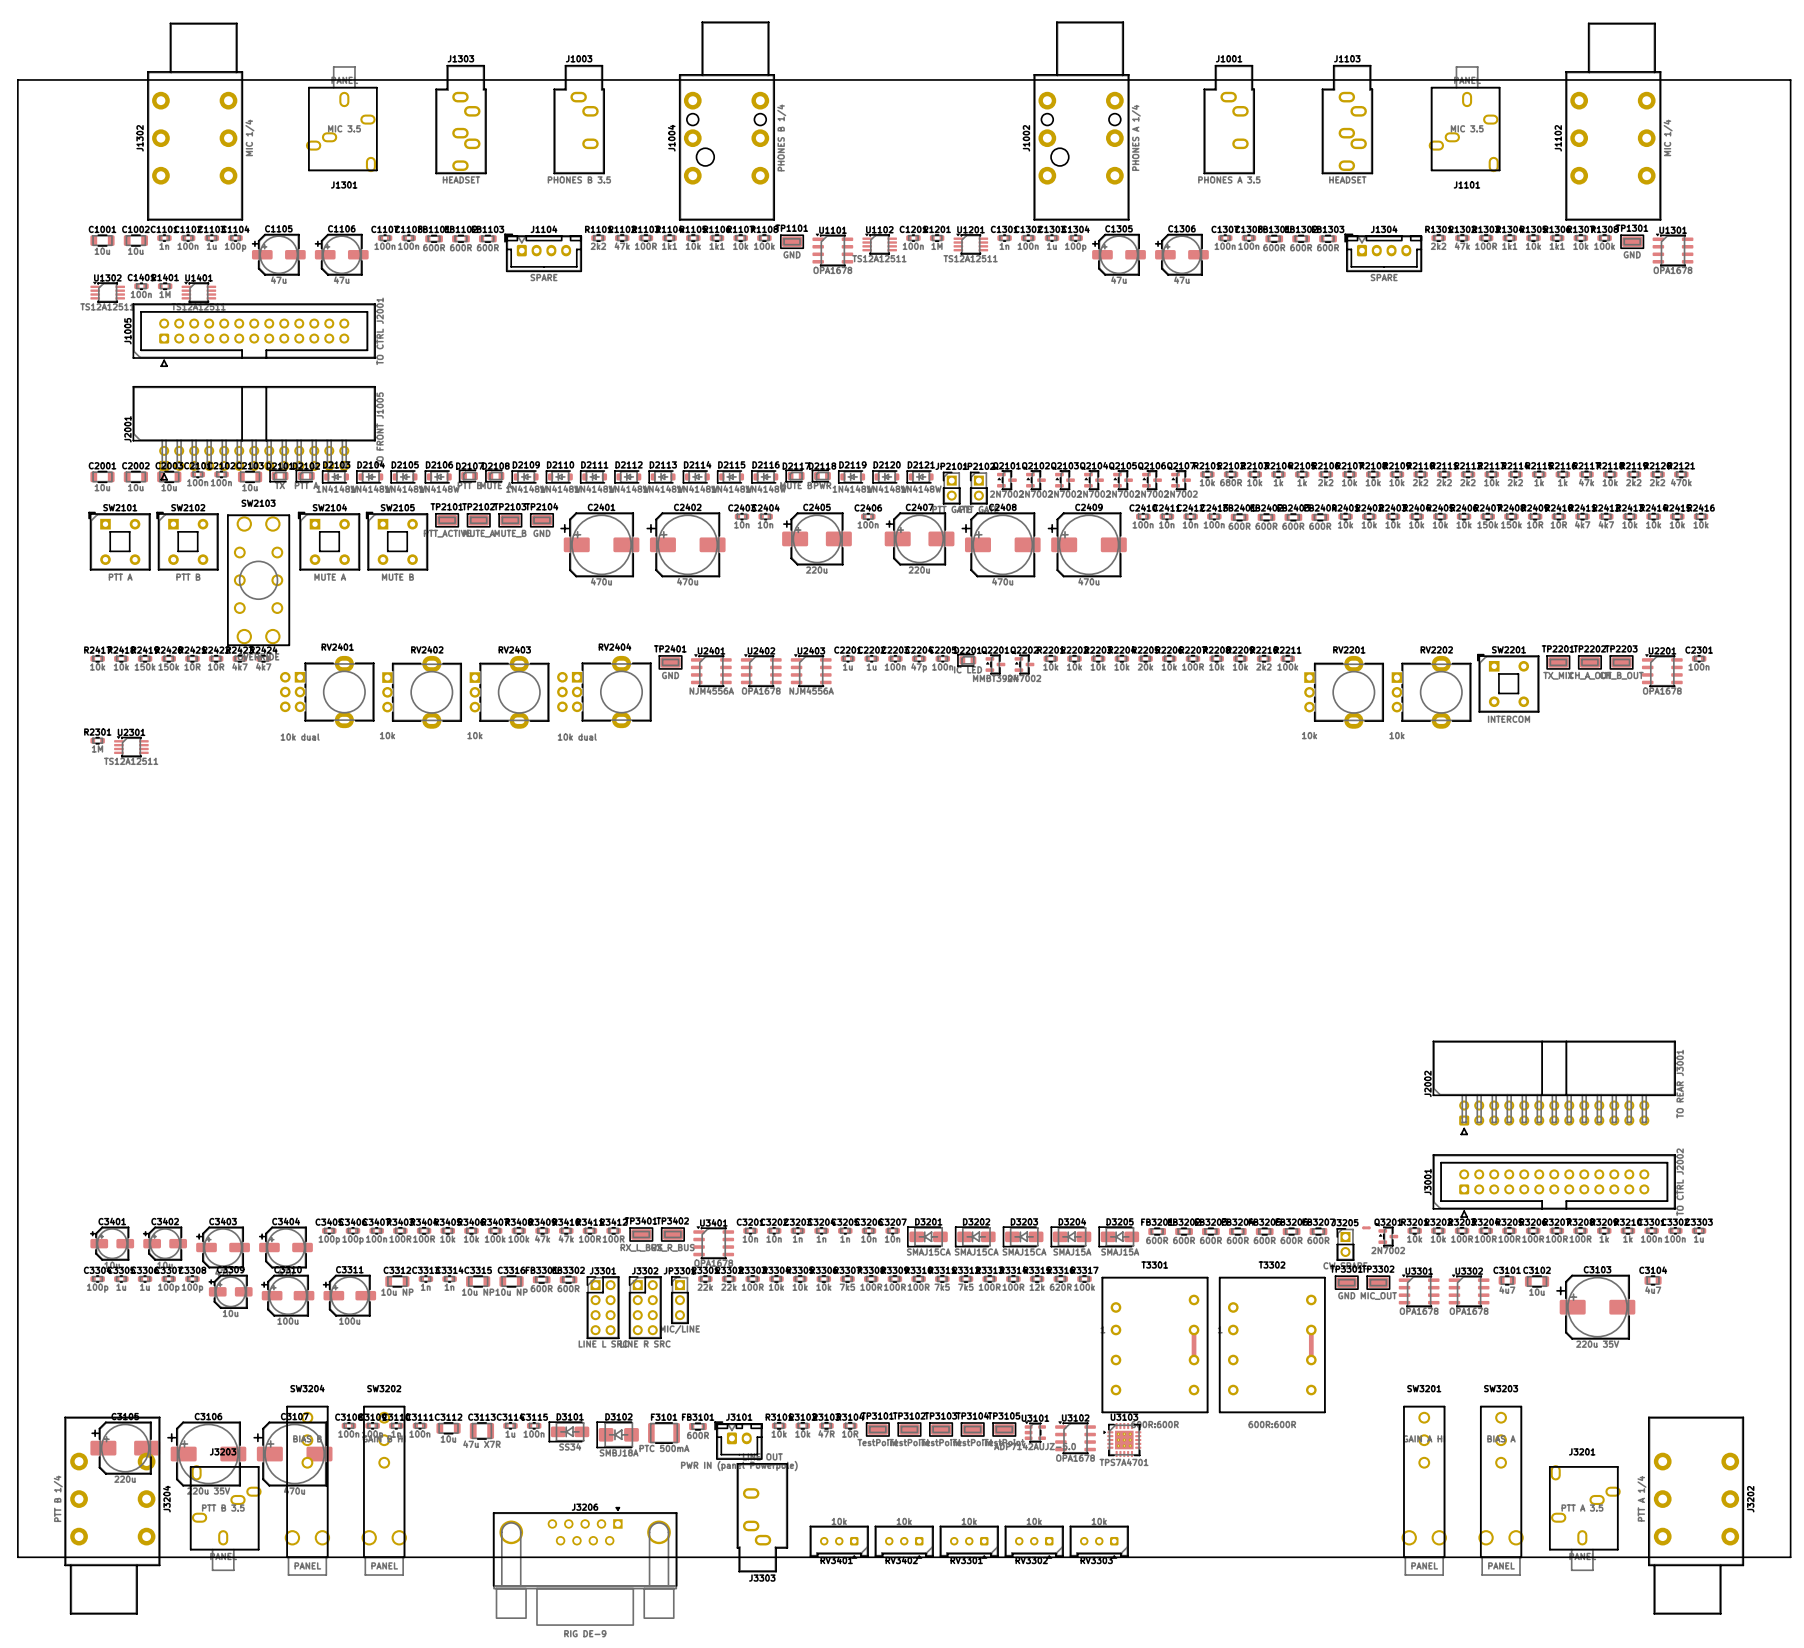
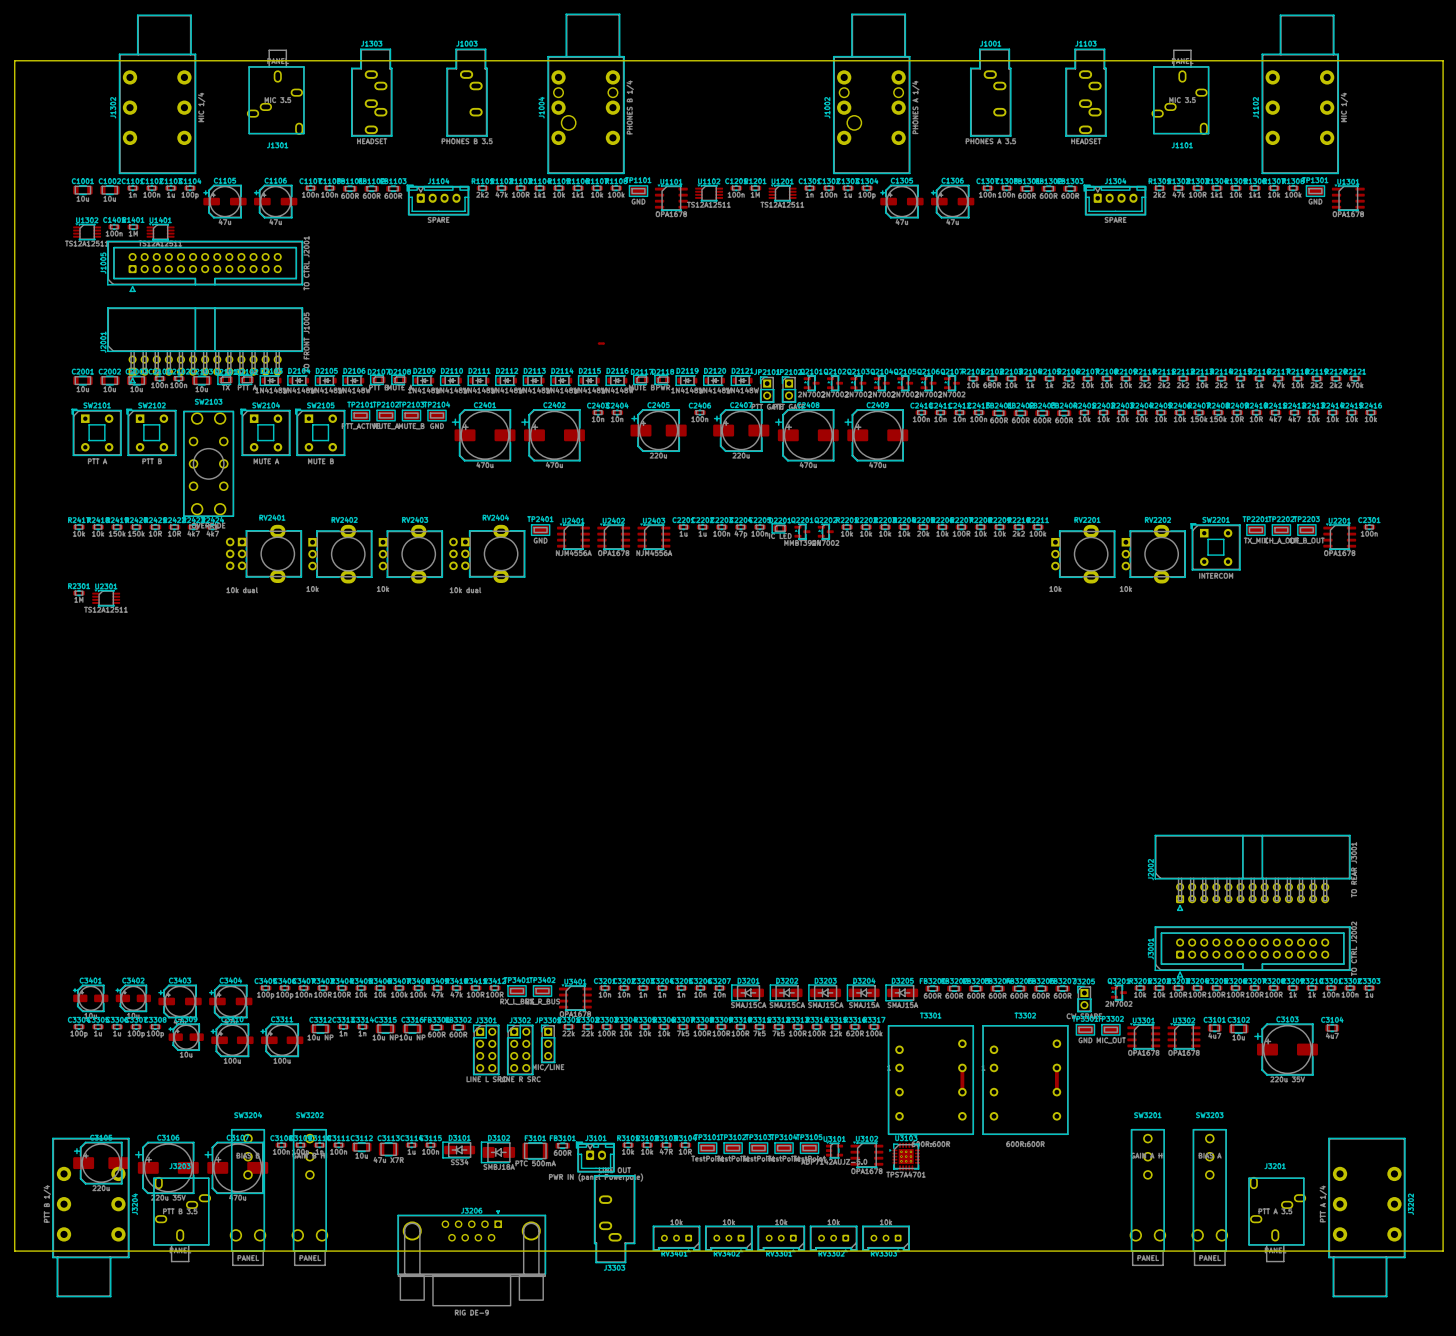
part: none -> (601, 343)
part: (1366, 1227) -> none

